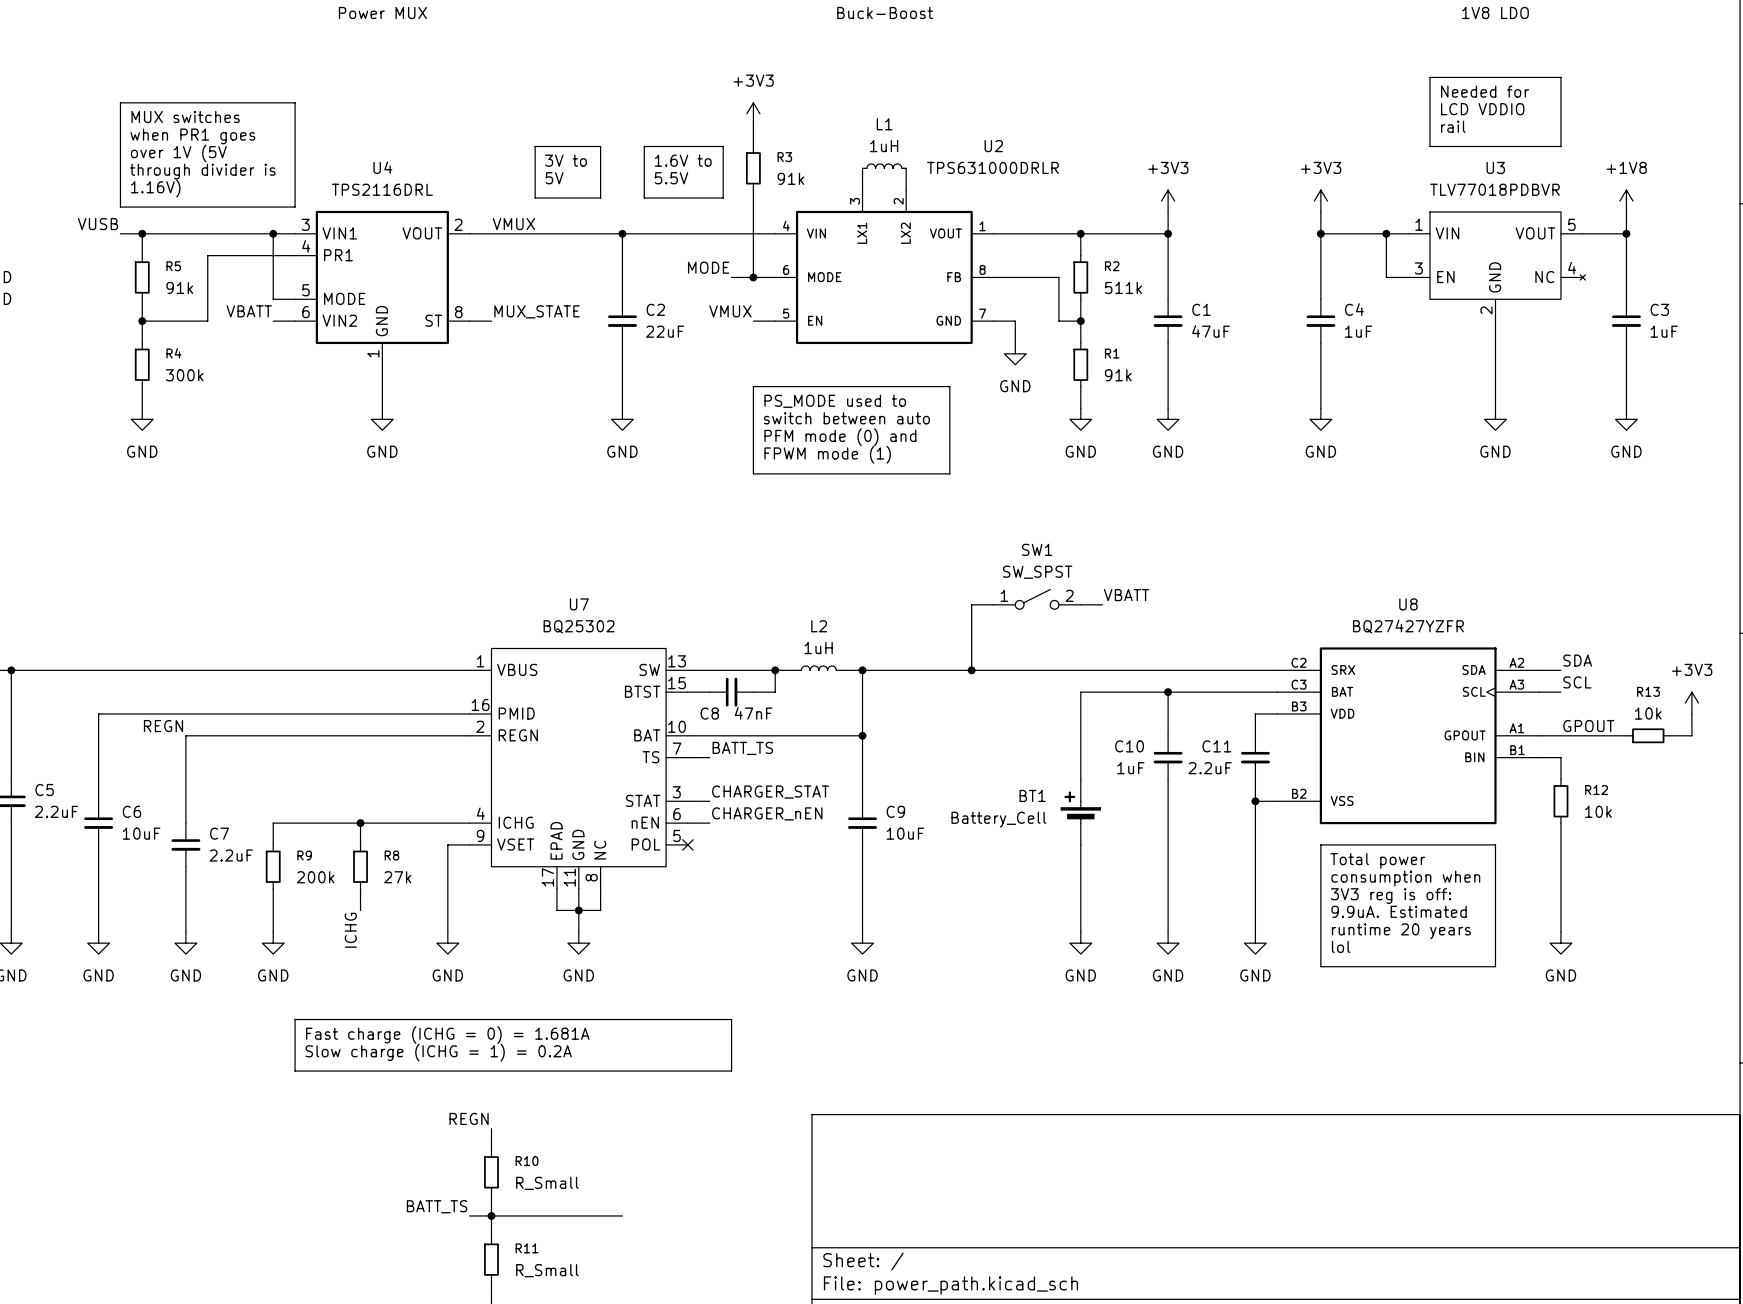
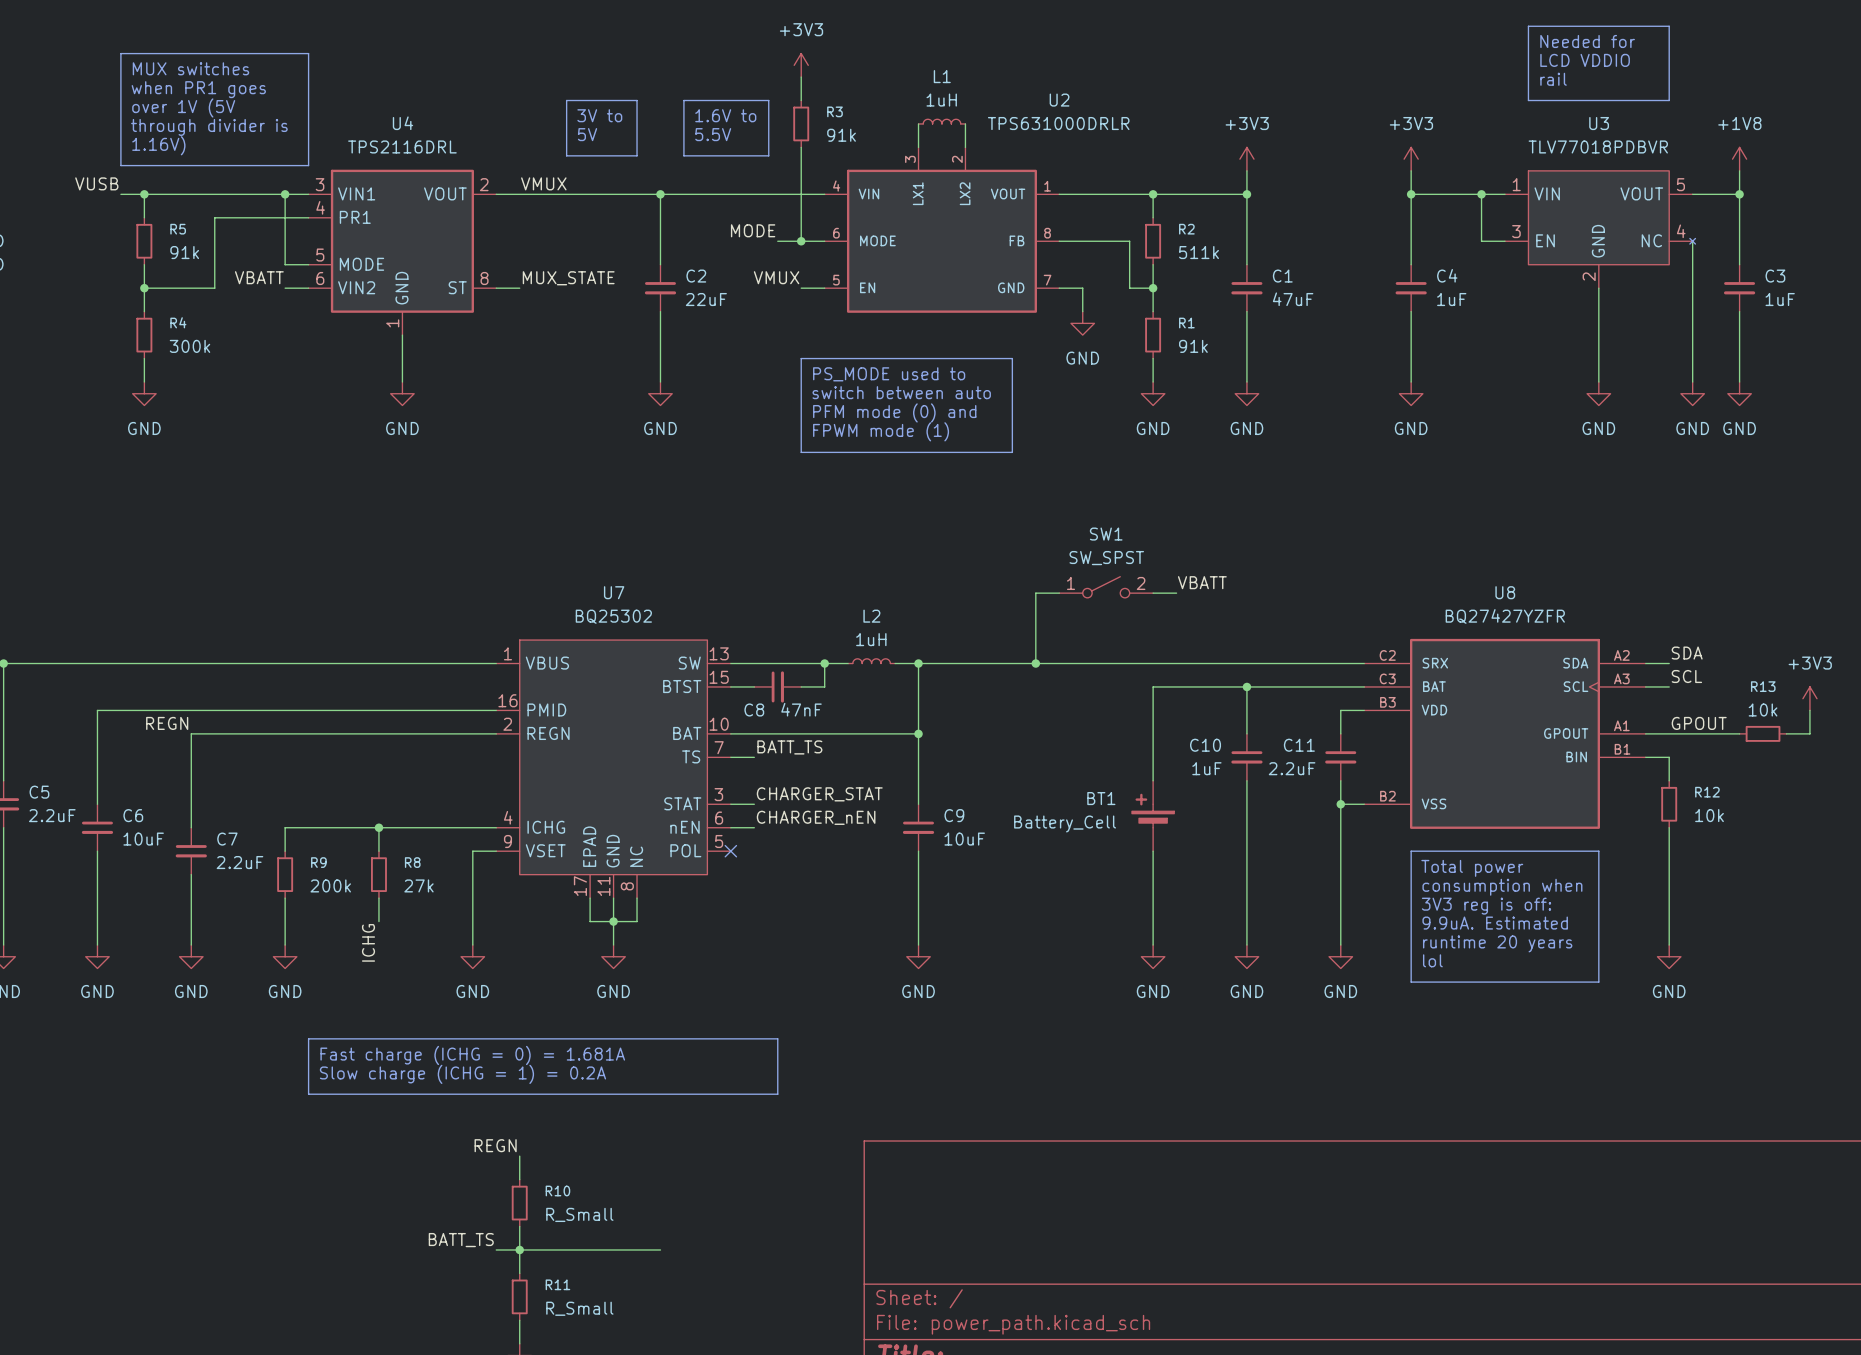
wire: none -> (1692, 241) (1692, 382)
power symbol: none -> GND (1692, 393)

